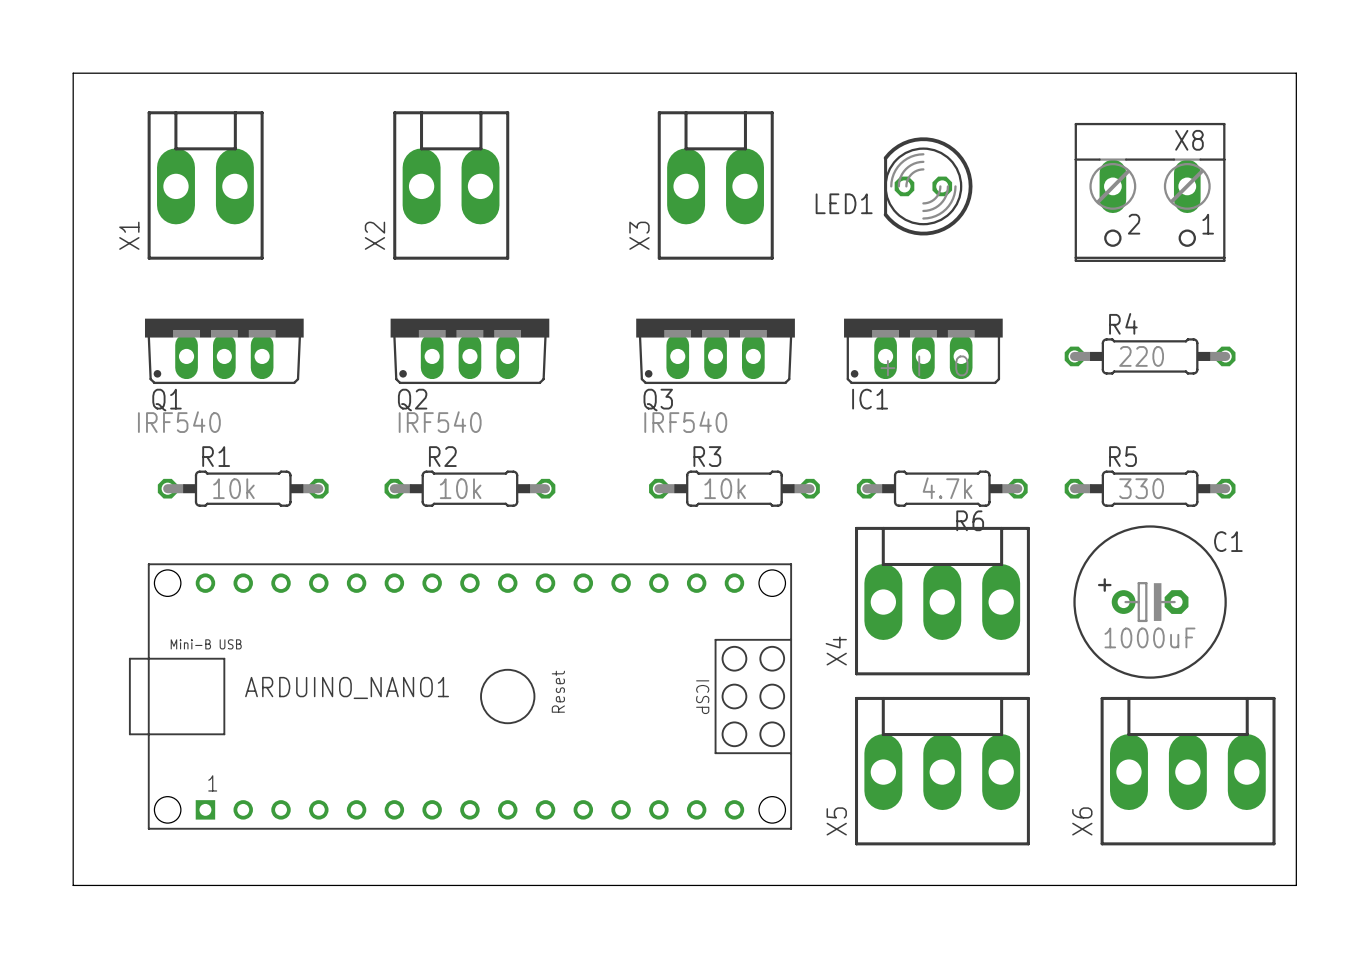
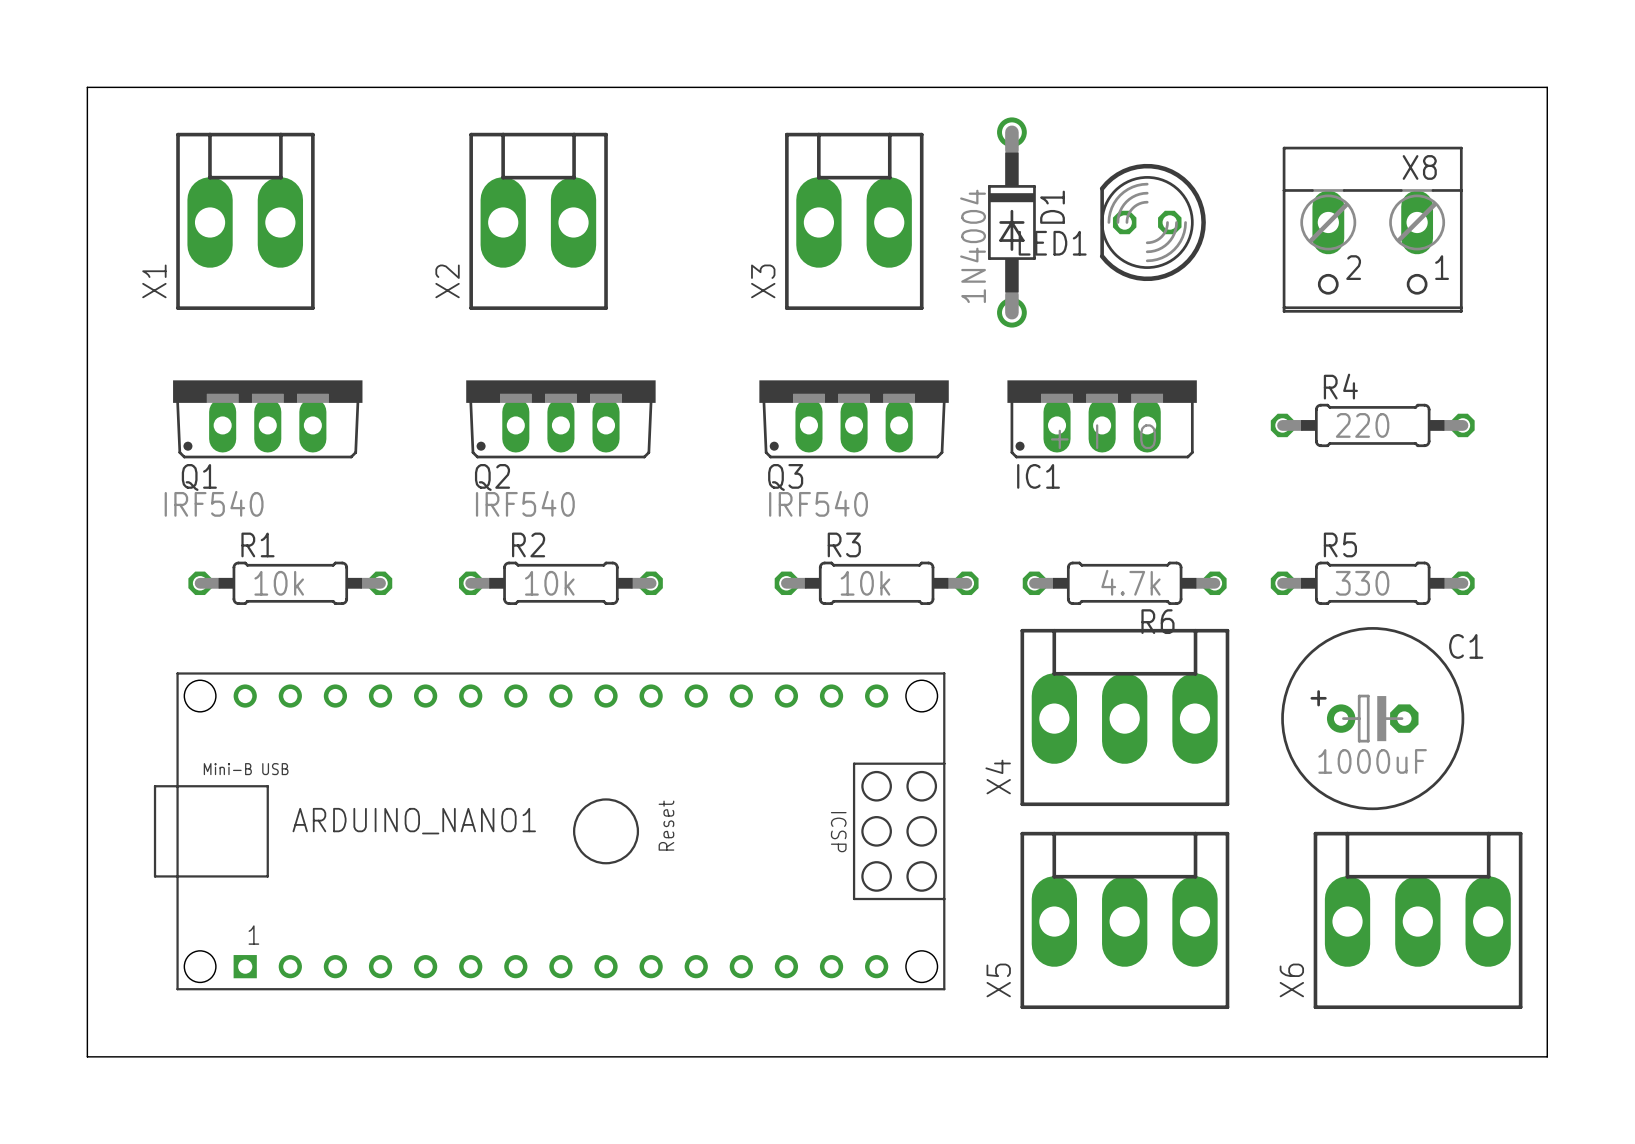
D1: none -> 1N4004 (1011, 222)
LED1 position: (928, 186) -> (1152, 222)

